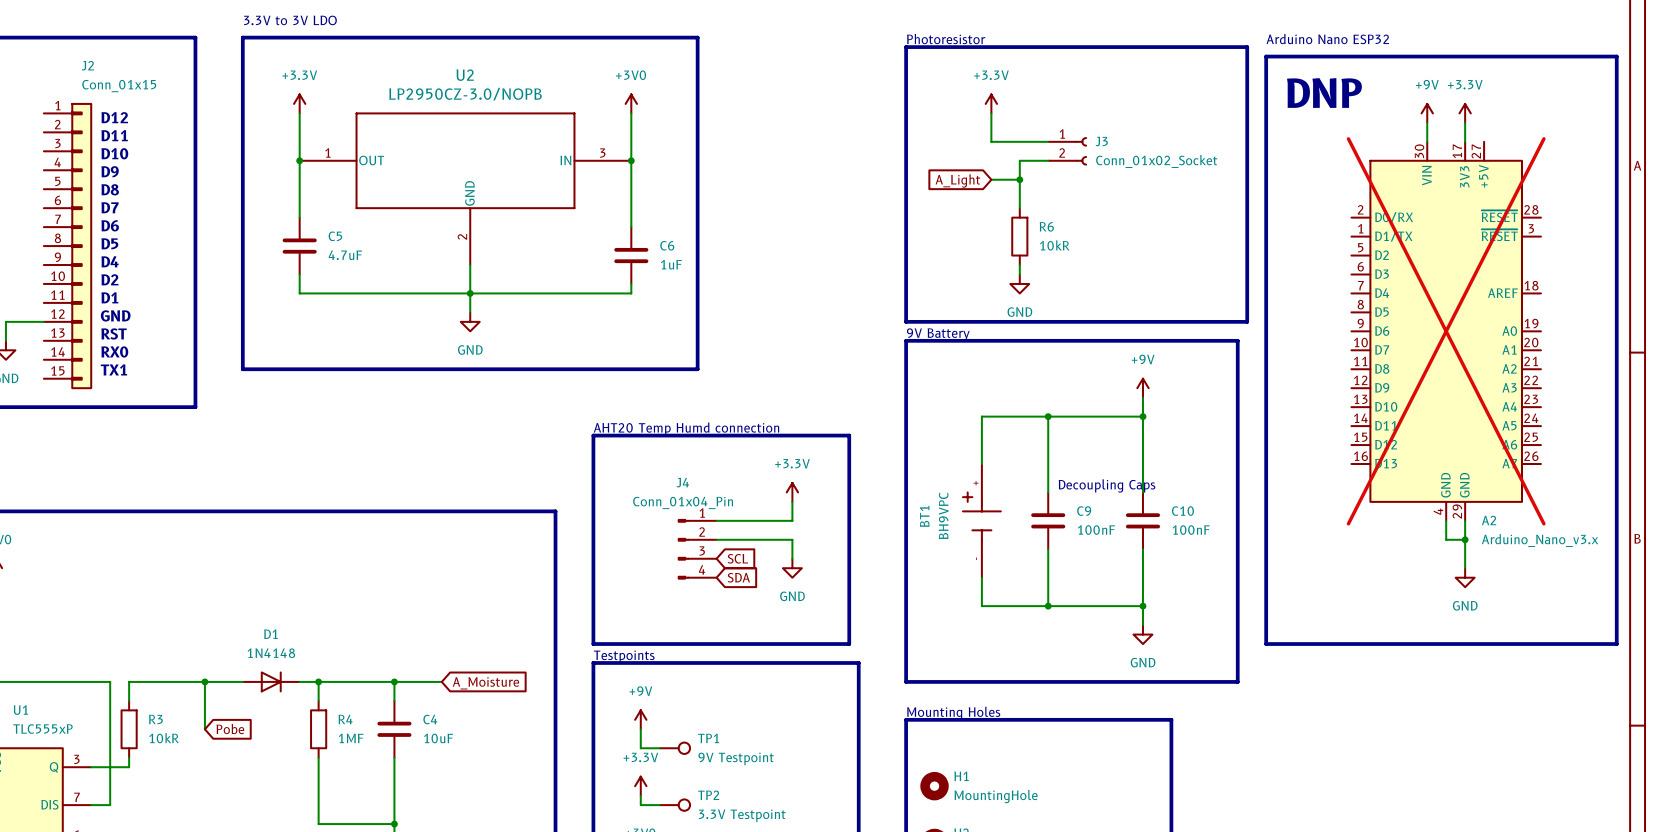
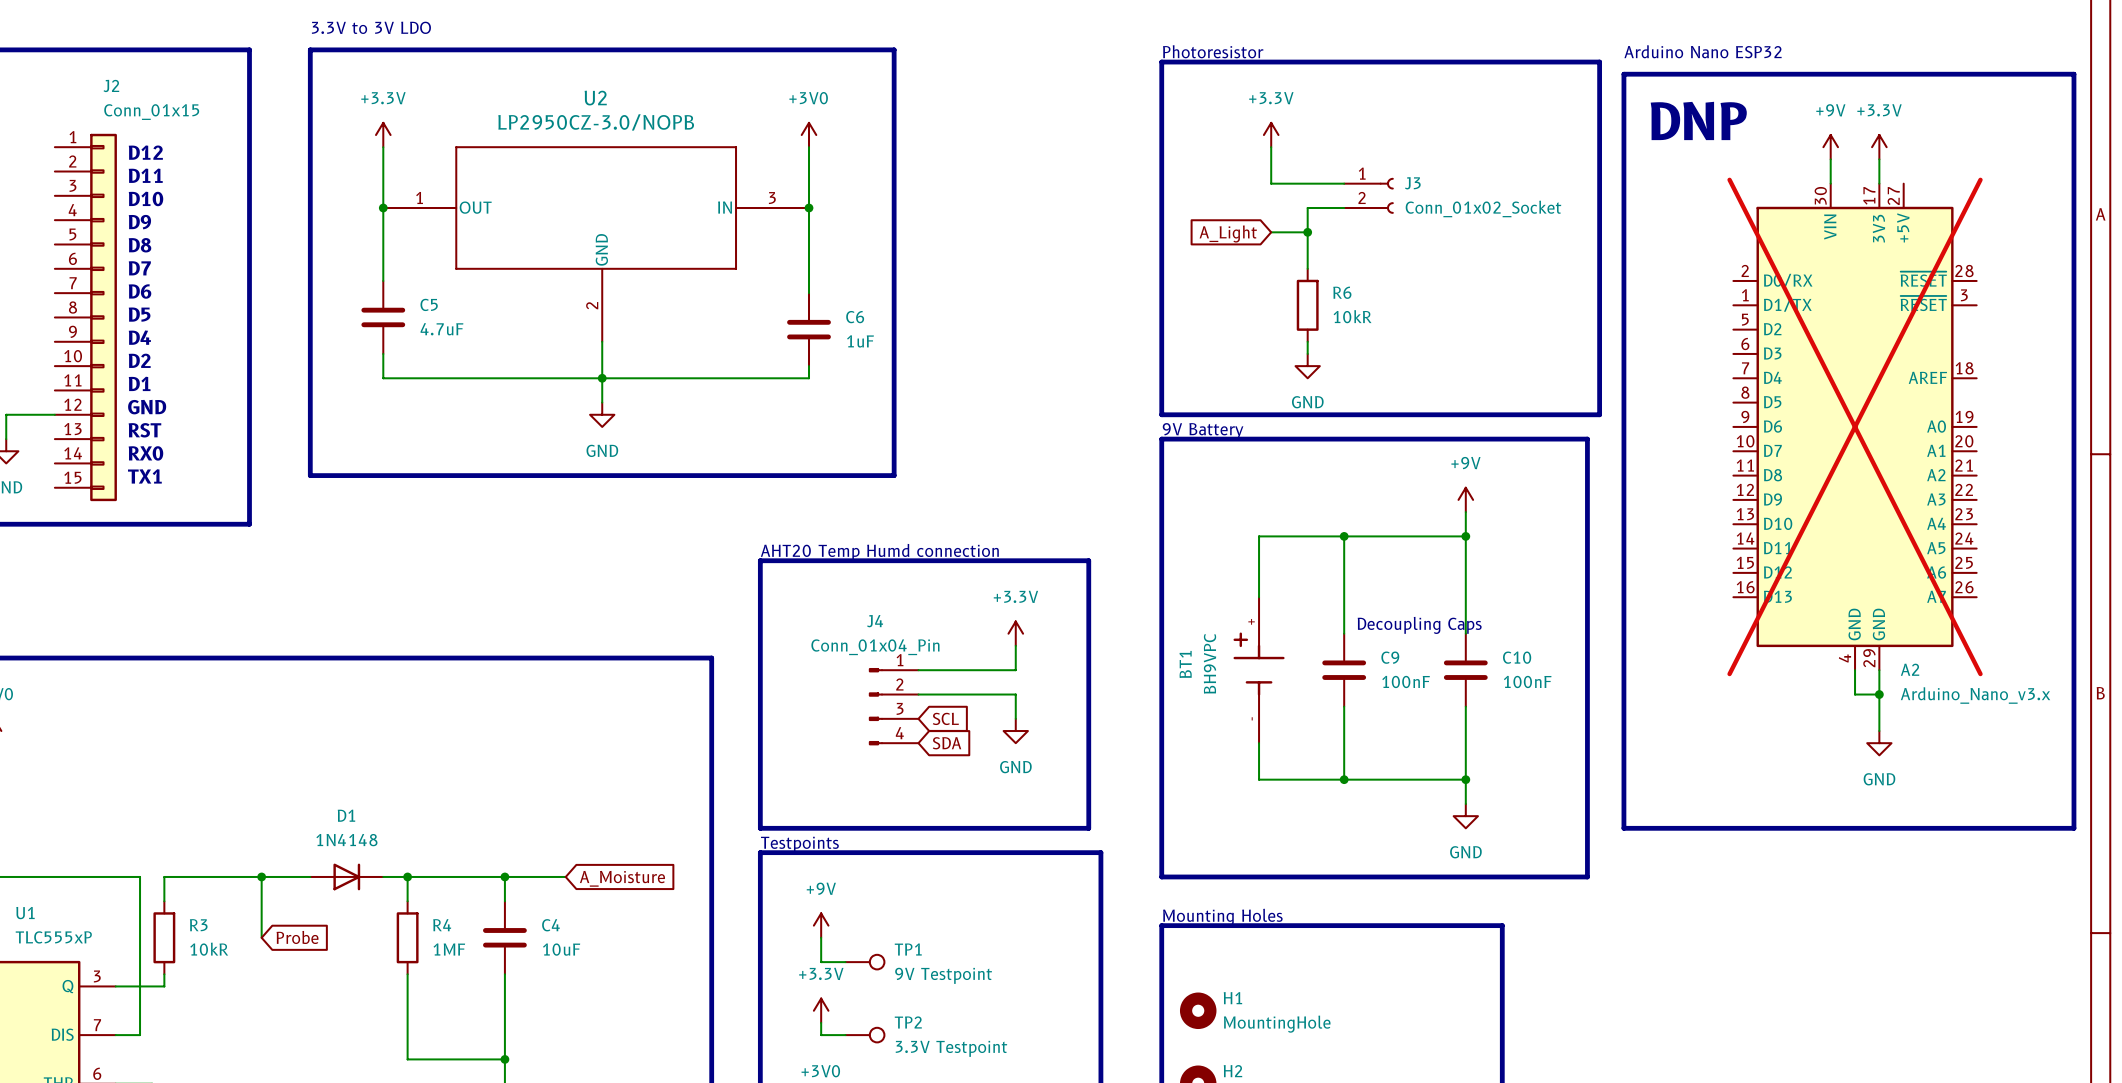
global label: Pobe (230, 729) -> Probe (297, 937)

